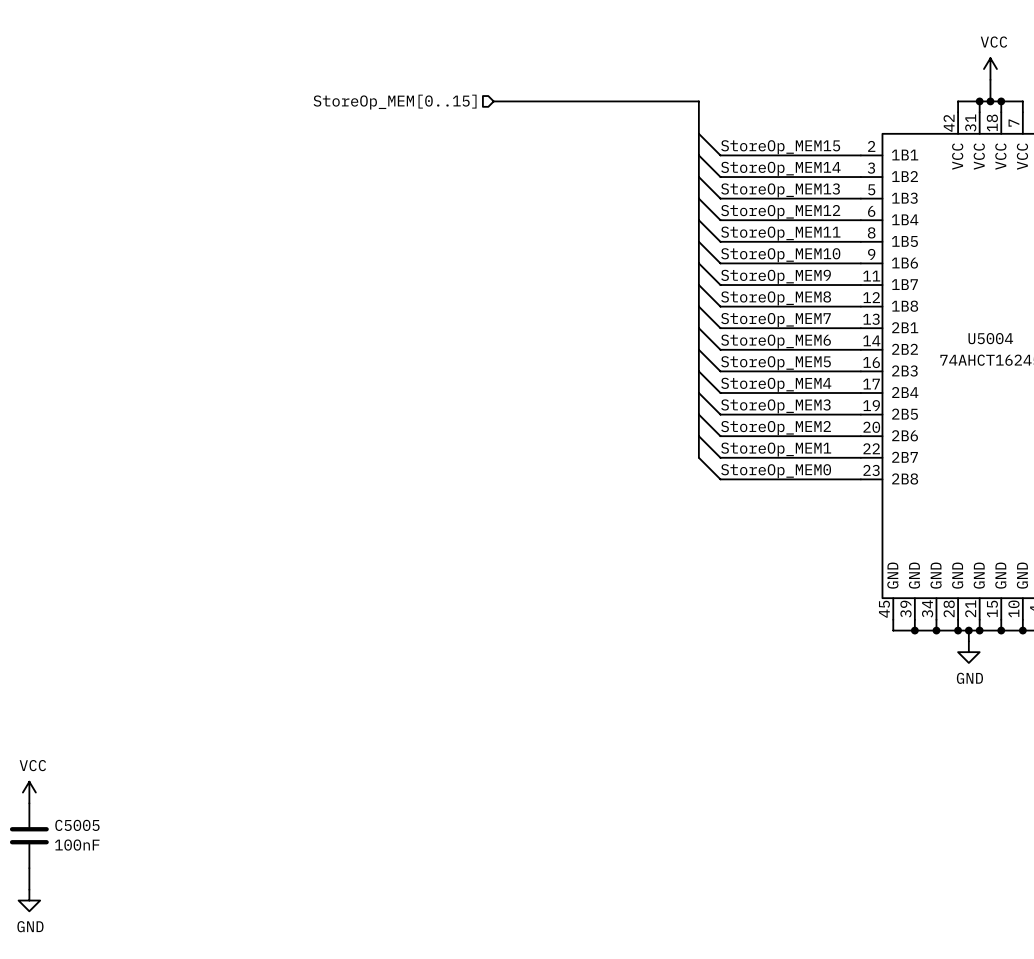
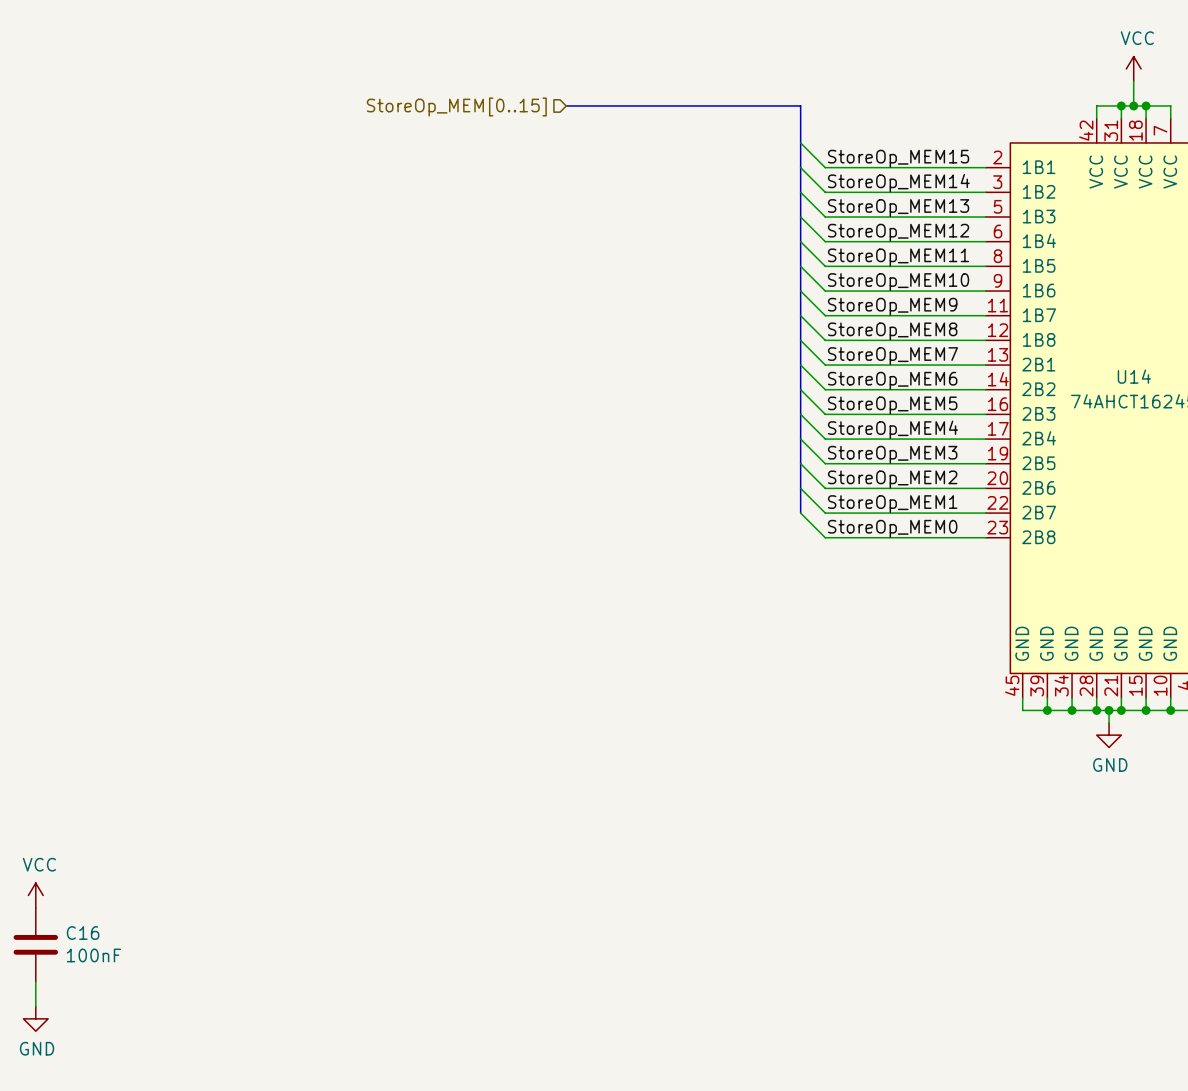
U5004 name: U5004 (990, 338) -> U14 (1134, 376)
C5005 name: C5005 (77, 825) -> C16 (83, 933)

